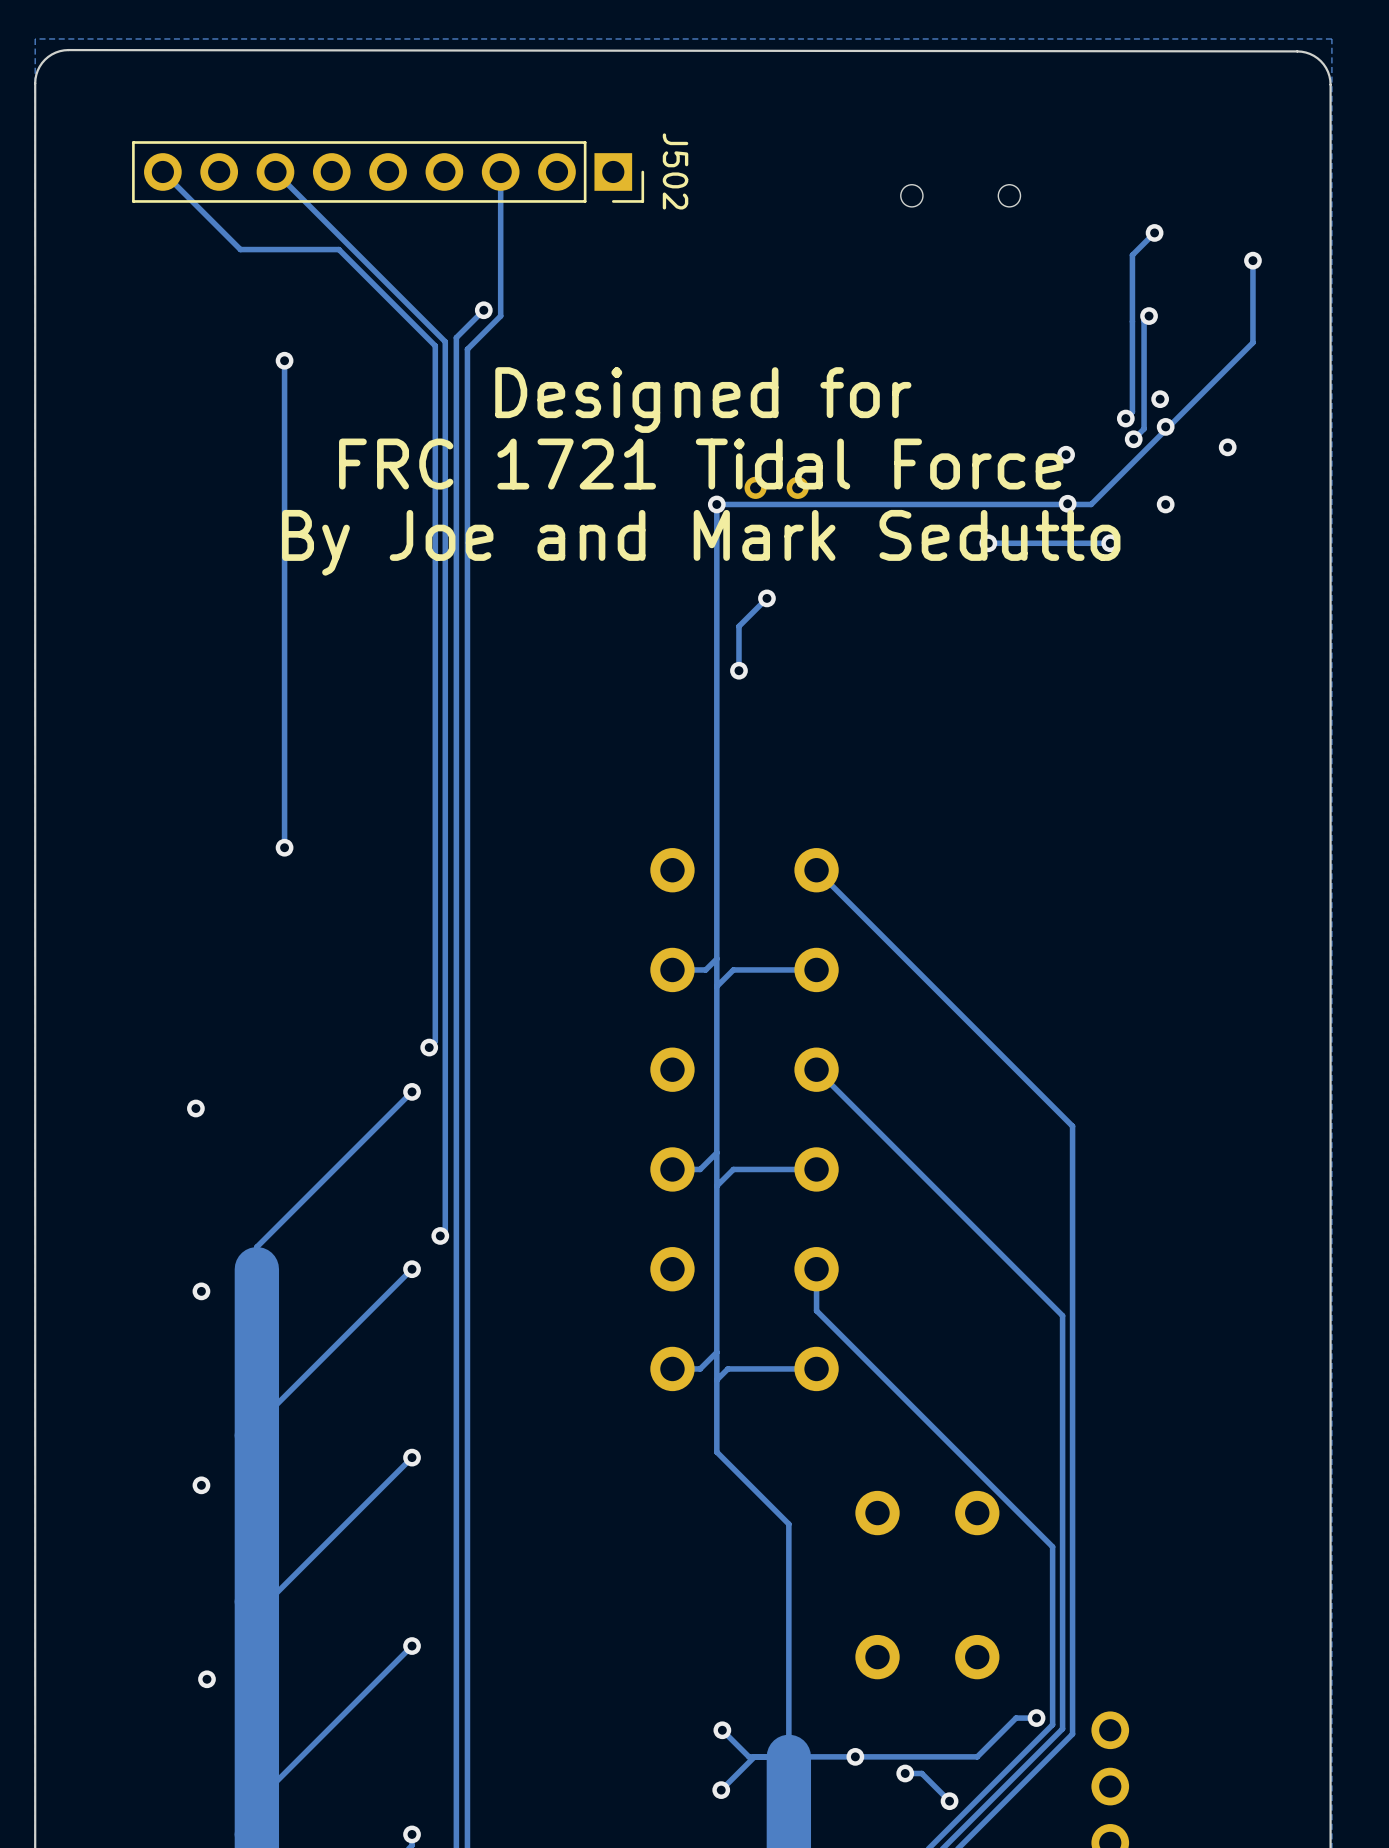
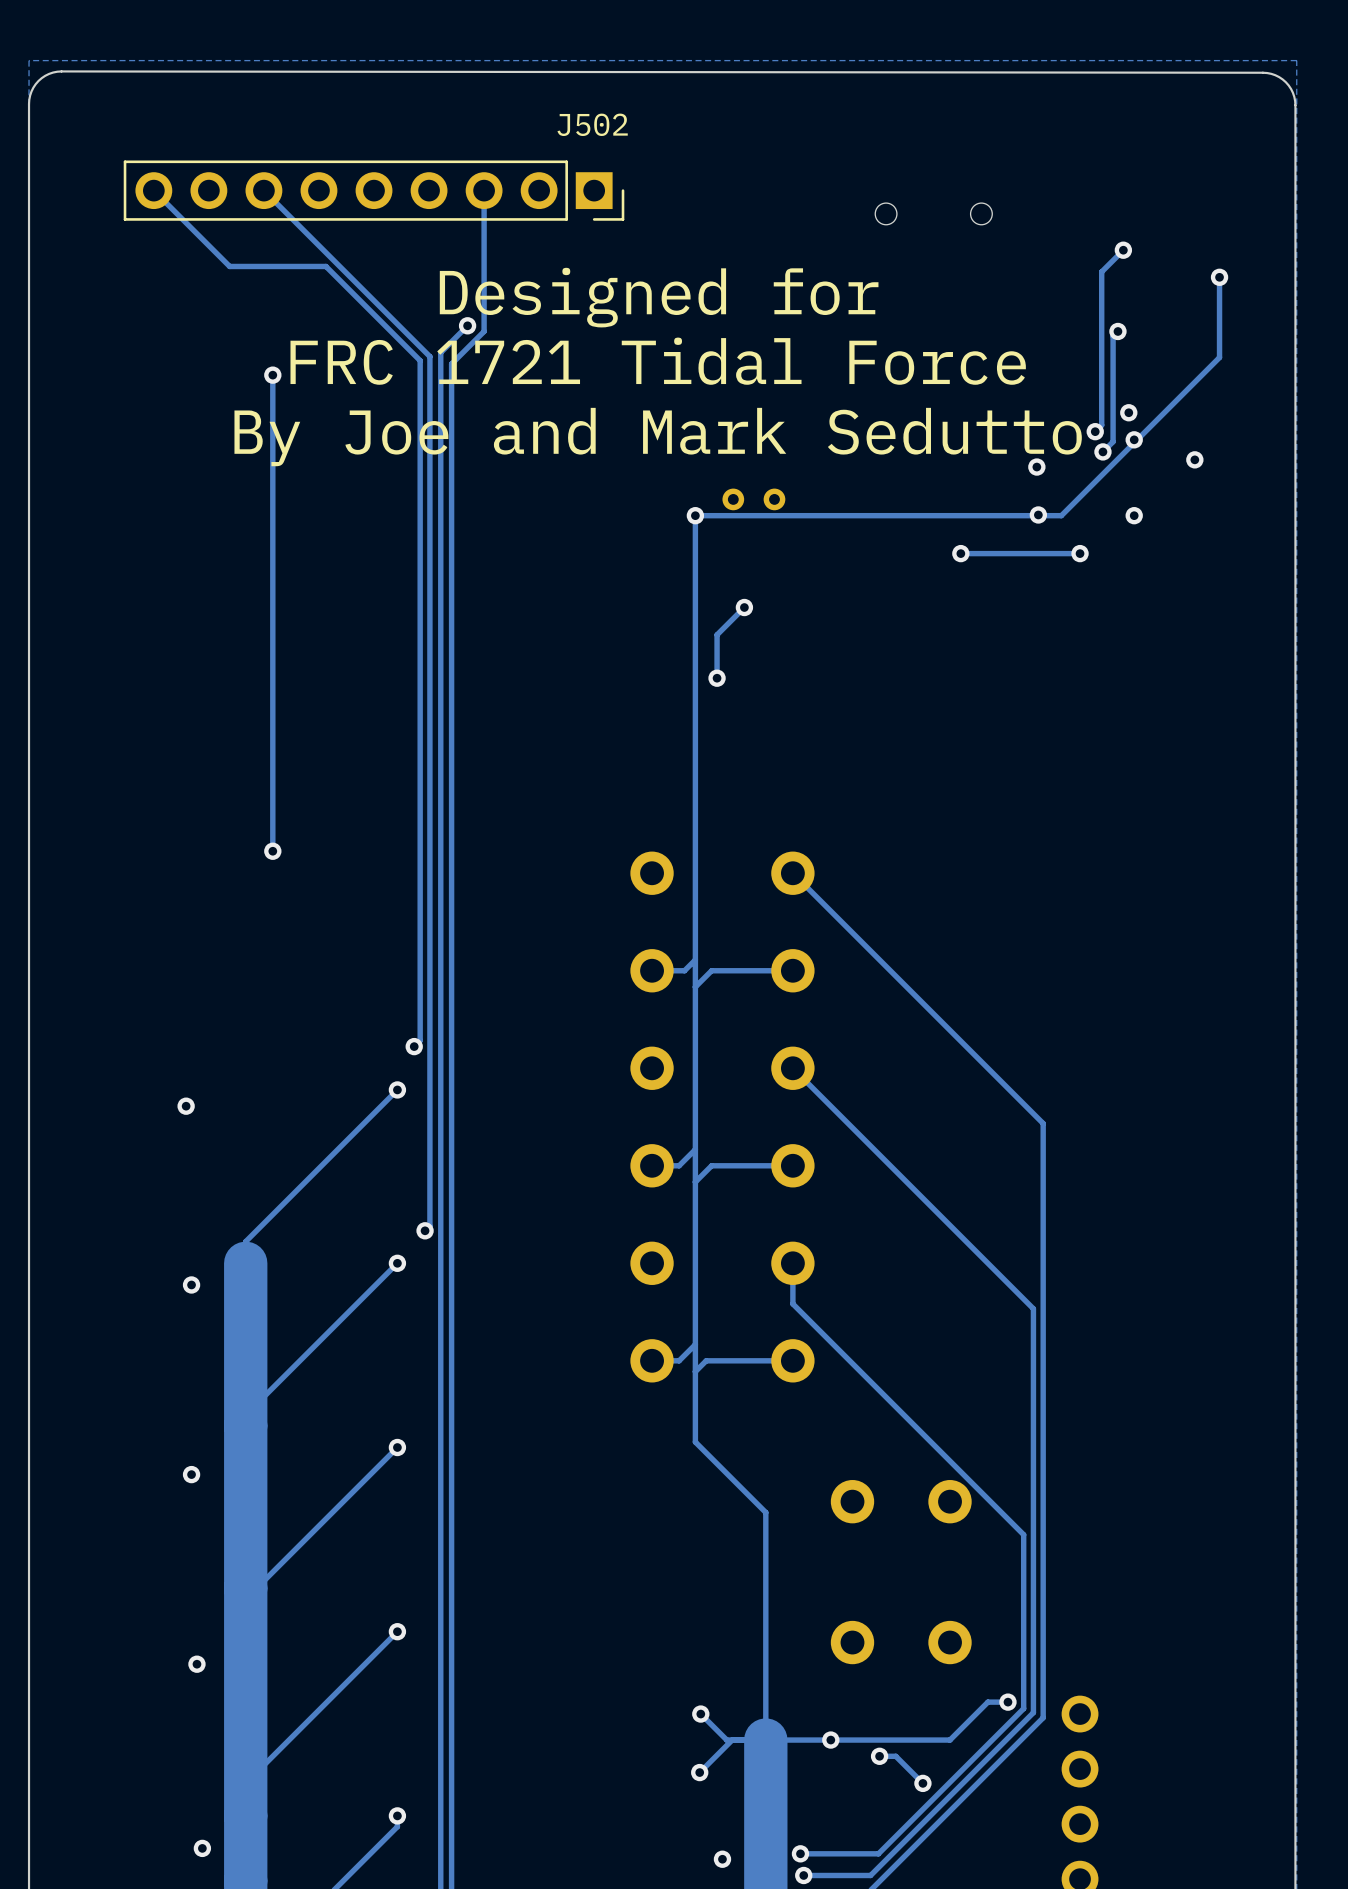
J502 name rotation: 0° (675, 171) -> 90° counterclockwise (592, 124)
text position: Designed for (703, 400) -> Designed for (659, 297)
text position: FRC 1721 Tidal Force (701, 464) -> FRC 1721 Tidal Force (658, 361)
text position: By Joe and Mark Sedutto (701, 542) -> By Joe and Mark Sedutto (658, 437)

